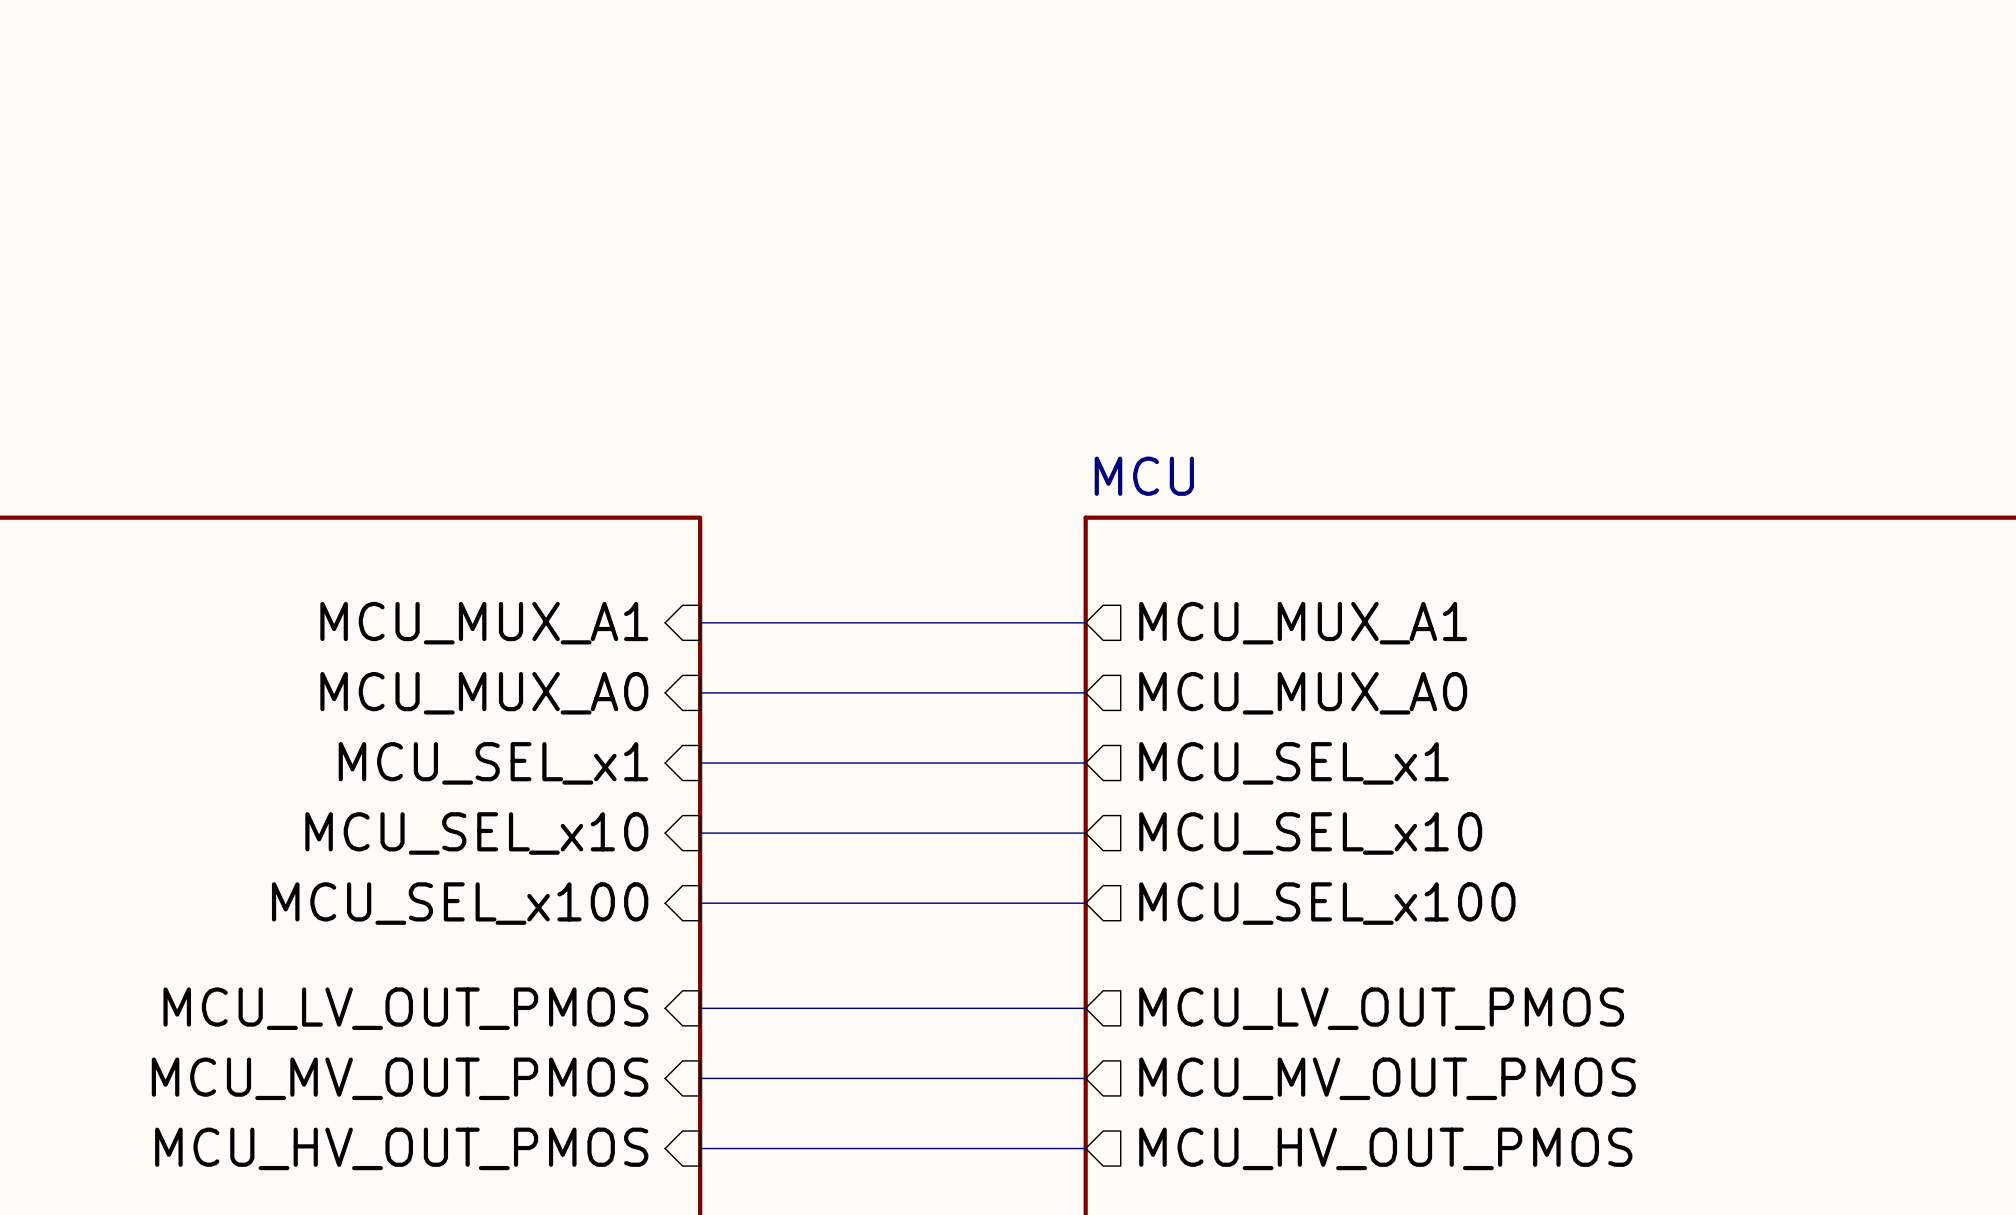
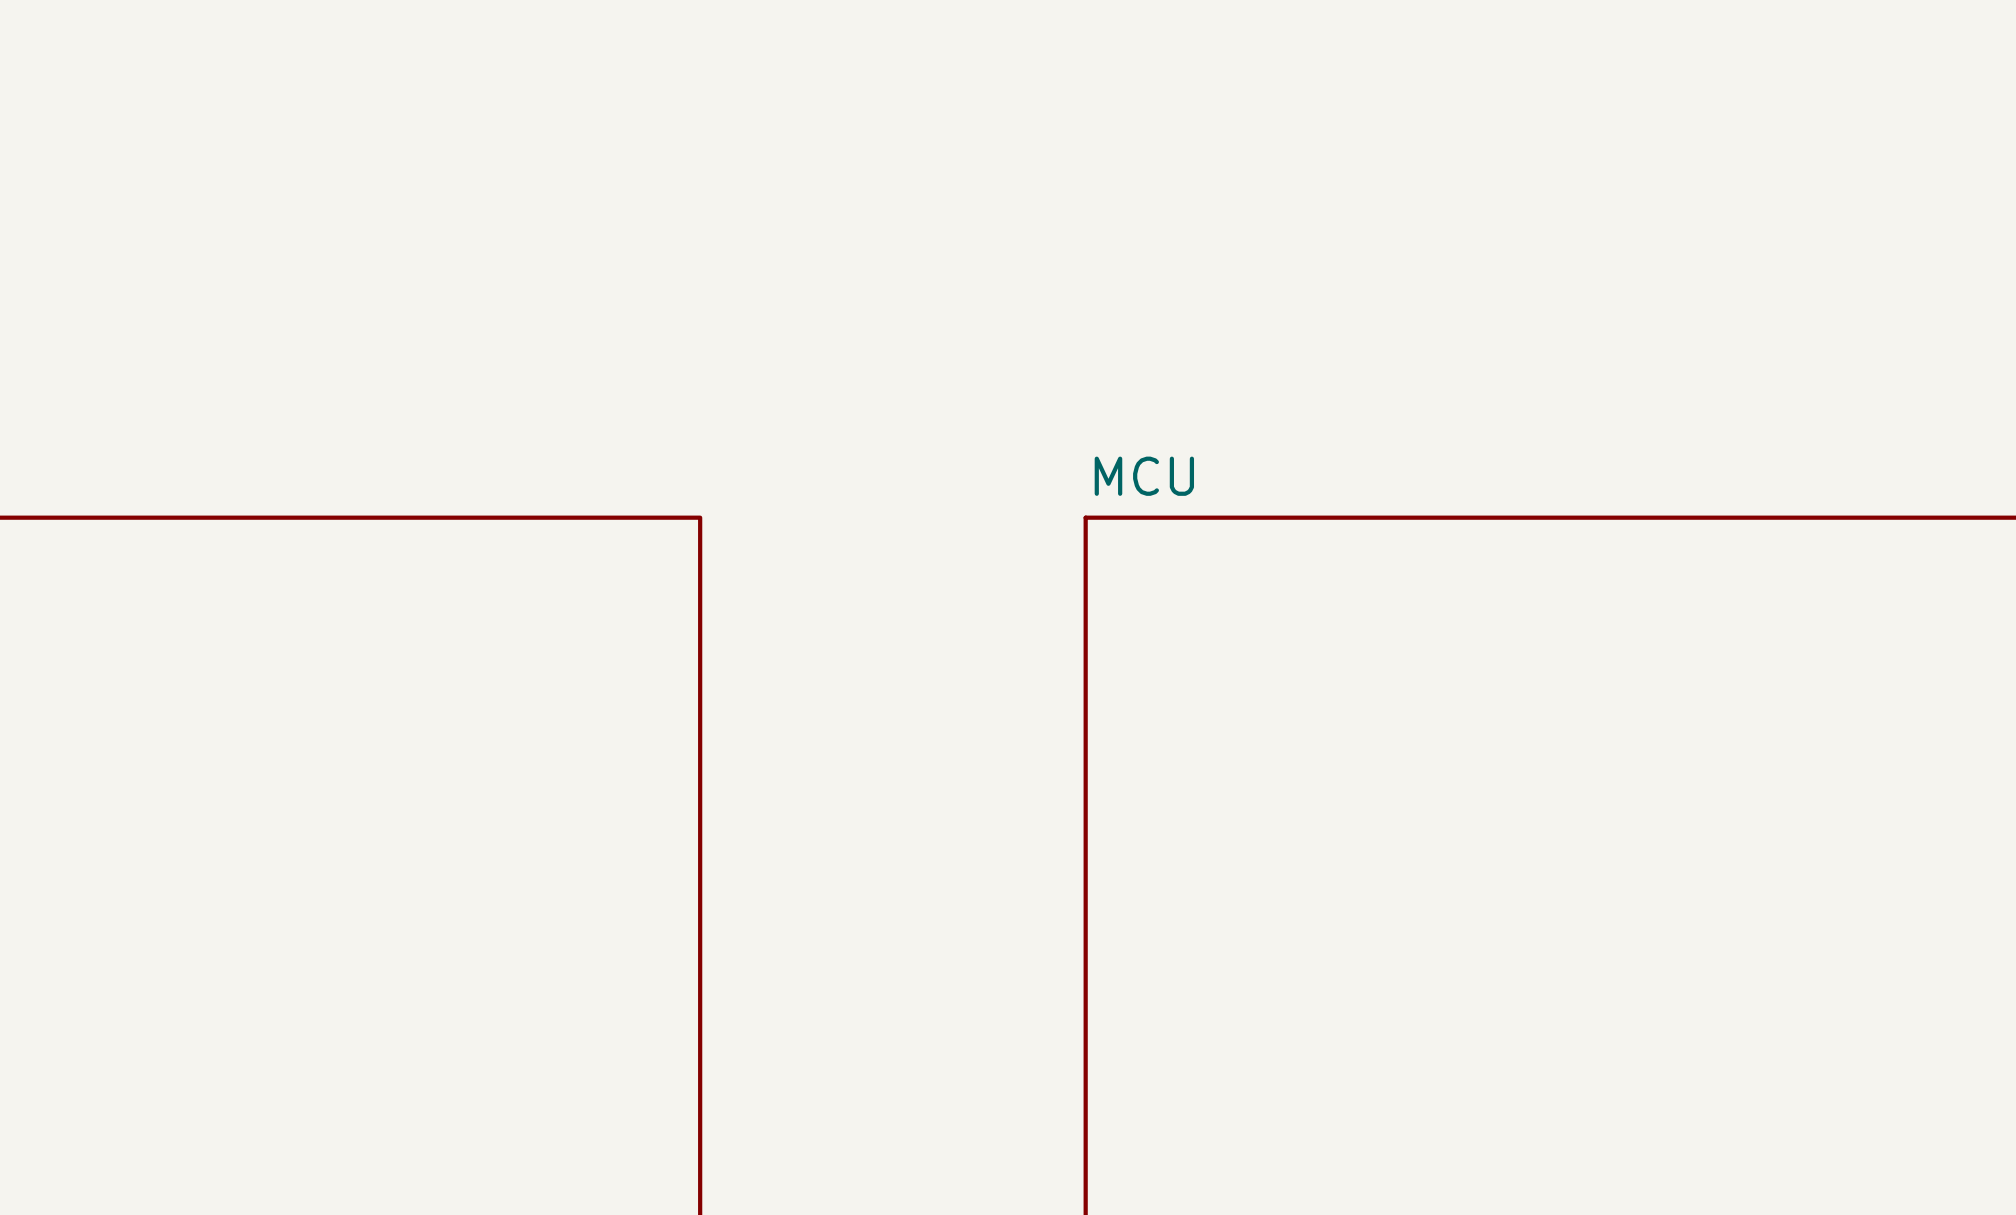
wire: (700, 622) (1085, 622) -> none
sheet pin: MCU_MUX_A1 (484, 623) -> none
sheet pin: MCU_MUX_A1 (1303, 623) -> none
wire: (700, 692) (1085, 692) -> none
sheet pin: MCU_MUX_A0 (484, 693) -> none
sheet pin: MCU_MUX_A0 (1303, 693) -> none
sheet pin: MCU_SEL_x1 (493, 763) -> none
wire: (700, 763) (1085, 763) -> none
sheet pin: MCU_SEL_x1 (1294, 763) -> none
sheet pin: MCU_SEL_x10 (476, 833) -> none
wire: (700, 833) (1085, 833) -> none
sheet pin: MCU_SEL_x10 (1310, 833) -> none
sheet pin: MCU_SEL_x100 (460, 903) -> none
wire: (700, 903) (1085, 903) -> none
sheet pin: MCU_SEL_x100 (1327, 903) -> none
sheet pin: MCU_LV_OUT_PMOS (405, 1008) -> none
wire: (700, 1008) (1085, 1008) -> none
sheet pin: MCU_LV_OUT_PMOS (1381, 1008) -> none
sheet pin: MCU_MV_OUT_PMOS (400, 1078) -> none
wire: (700, 1078) (1085, 1078) -> none
sheet pin: MCU_MV_OUT_PMOS (1387, 1078) -> none
sheet pin: MCU_HV_OUT_PMOS (401, 1148) -> none
wire: (700, 1148) (1085, 1148) -> none
sheet pin: MCU_HV_OUT_PMOS (1385, 1148) -> none

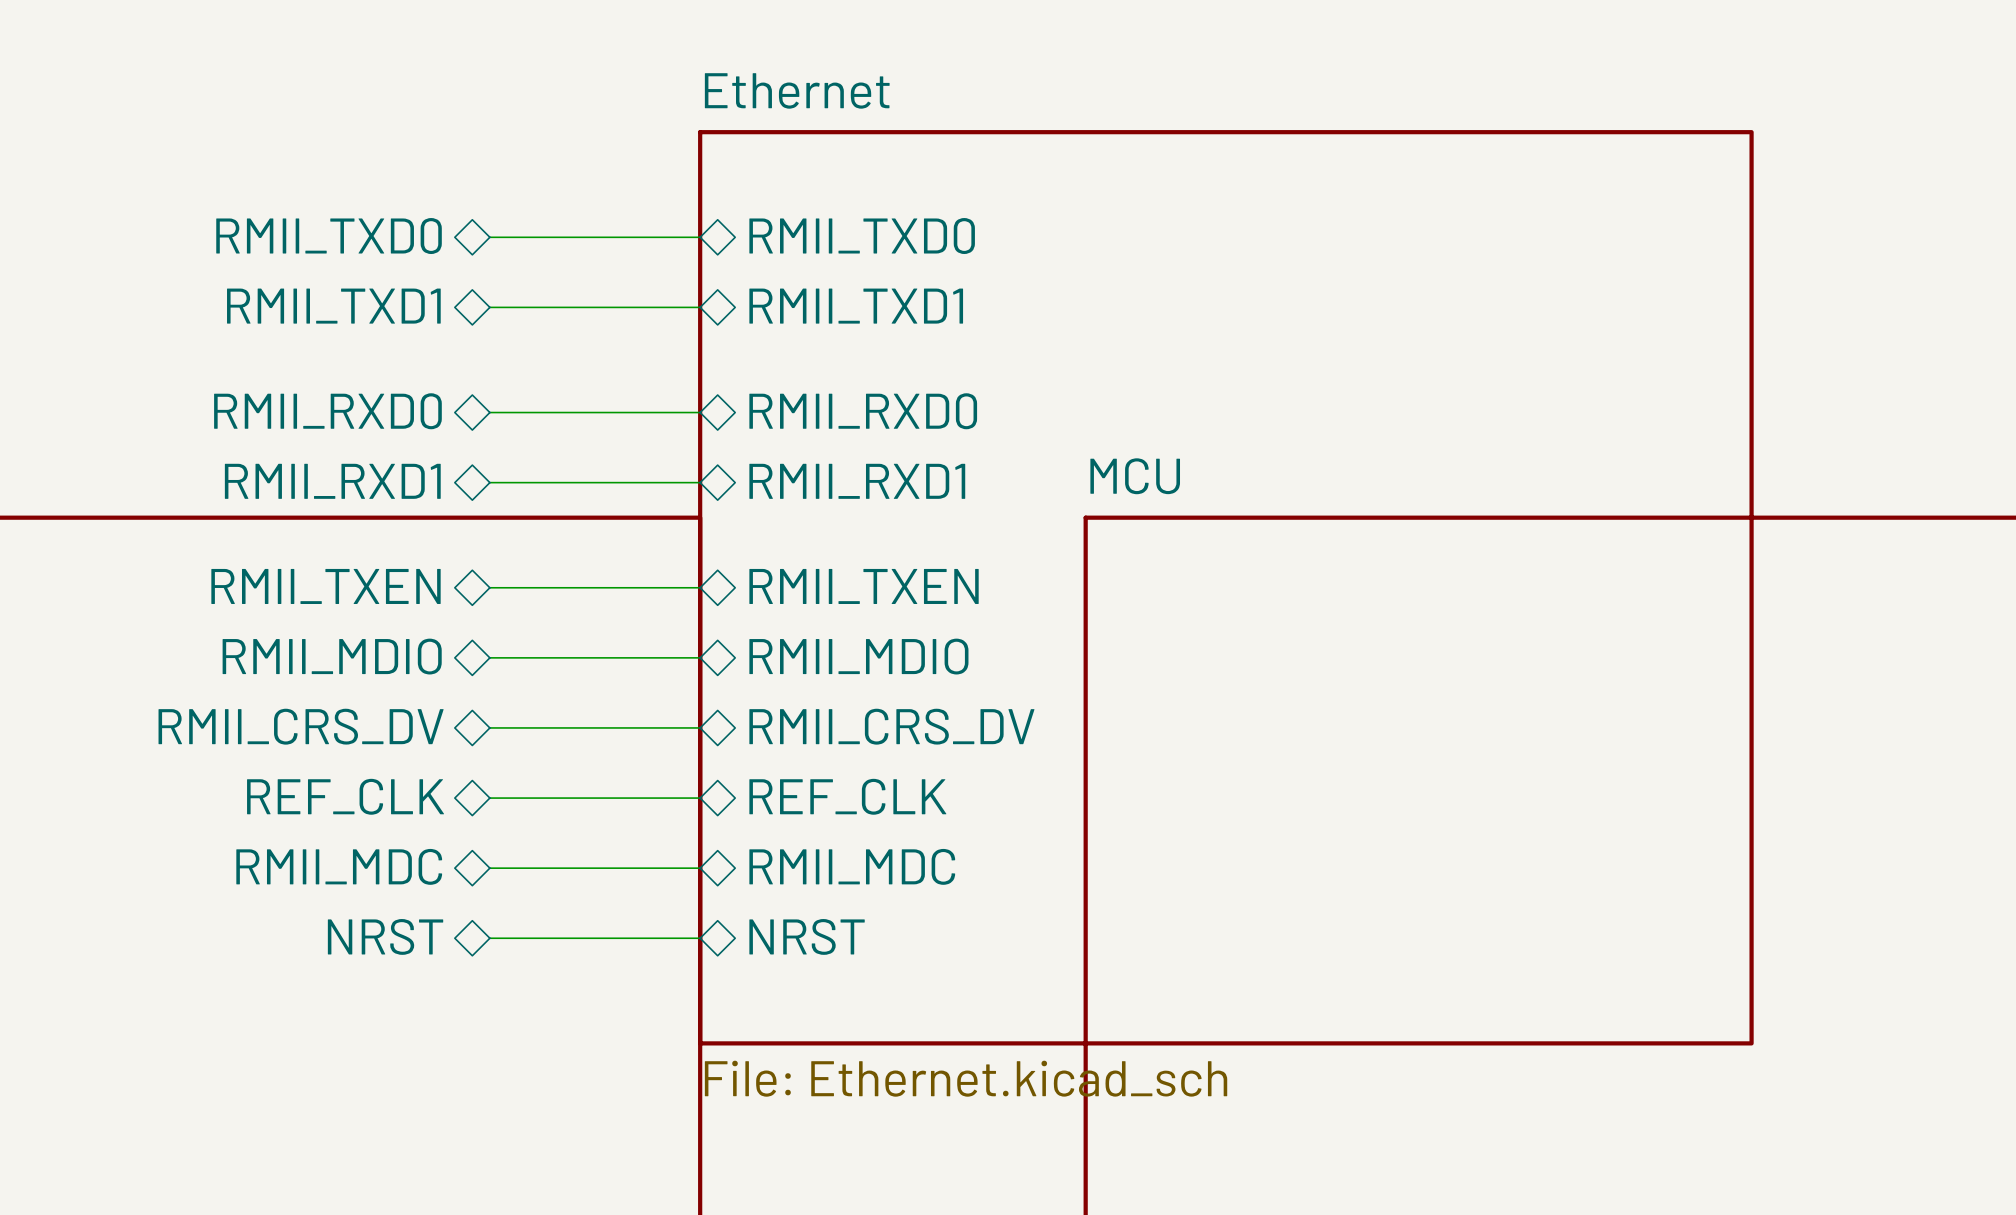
sheet pin: none -> RMII_TXD0 (329, 236)
wire: none -> (489, 237) (700, 237)
sheet pin: none -> RMII_TXD0 (862, 236)
sheet pin: none -> RMII_TXD1 (333, 306)
wire: none -> (489, 307) (700, 307)
sheet pin: none -> RMII_TXD1 (856, 306)
sheet pin: none -> RMII_RXD0 (327, 411)
wire: none -> (489, 412) (700, 412)
sheet pin: none -> RMII_RXD0 (863, 411)
sheet pin: none -> RMII_RXD1 (332, 481)
wire: none -> (489, 482) (700, 482)
sheet pin: none -> RMII_RXD1 (857, 481)
wire: none -> (489, 587) (700, 587)
sheet Ethernet: none -> File: Ethernet.kicad_sch (1225, 587)
sheet pin: none -> RMII_TXEN (326, 586)
sheet pin: none -> RMII_TXEN (864, 586)
wire: none -> (489, 657) (700, 657)
sheet pin: none -> RMII_MDIO (332, 656)
sheet pin: none -> RMII_MDIO (858, 656)
wire: none -> (489, 727) (700, 727)
sheet pin: none -> RMII_CRS_DV (301, 726)
sheet pin: none -> RMII_CRS_DV (891, 726)
sheet pin: none -> REF_CLK (345, 796)
wire: none -> (489, 798) (700, 798)
sheet pin: none -> REF_CLK (847, 796)
sheet pin: none -> RMII_MDC (339, 866)
wire: none -> (489, 868) (700, 868)
sheet pin: none -> RMII_MDC (852, 866)
sheet pin: none -> NRST (385, 936)
sheet pin: none -> NRST (807, 936)
wire: none -> (489, 938) (700, 938)

